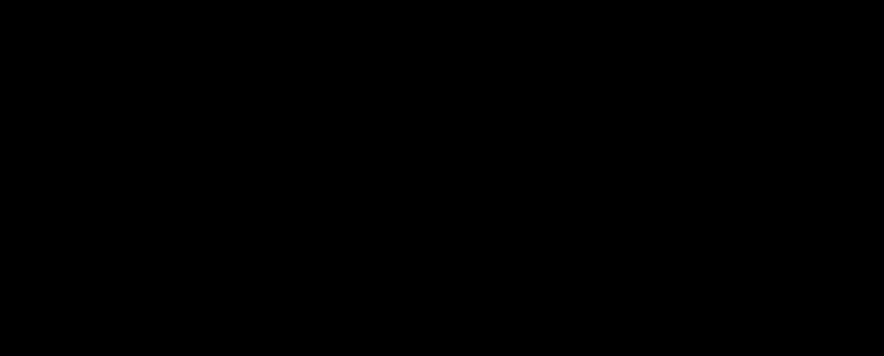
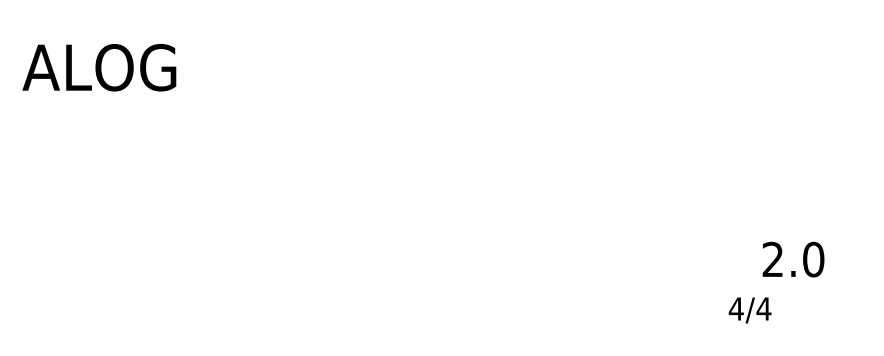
text: none -> ALOG (99, 67)
text: none -> 2.0 (793, 259)
text: none -> 4/4 (750, 310)

